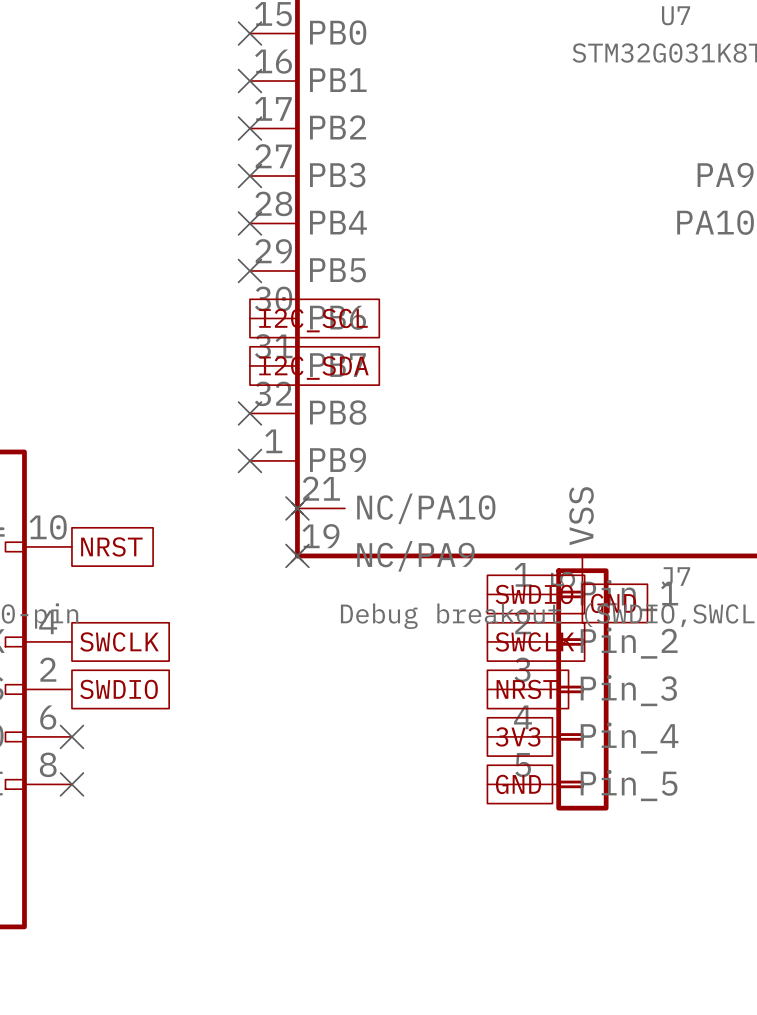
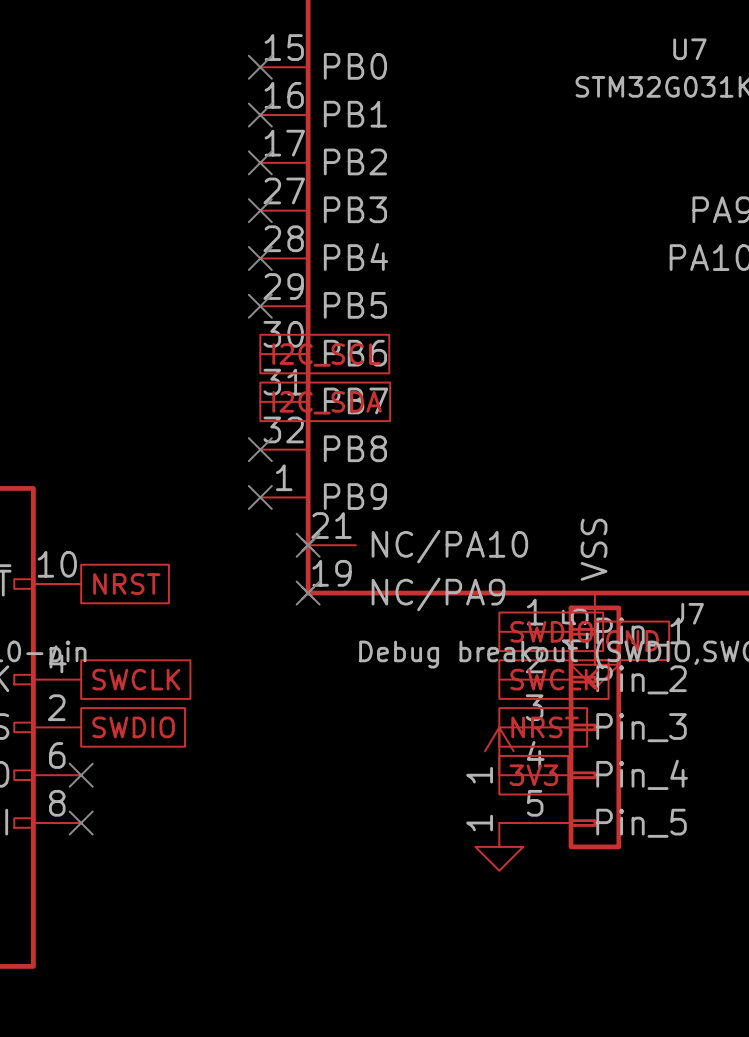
power symbol: none -> (594, 664)
power symbol: none -> (499, 751)
global label: GND (518, 784) -> none
power symbol: none -> (499, 846)

